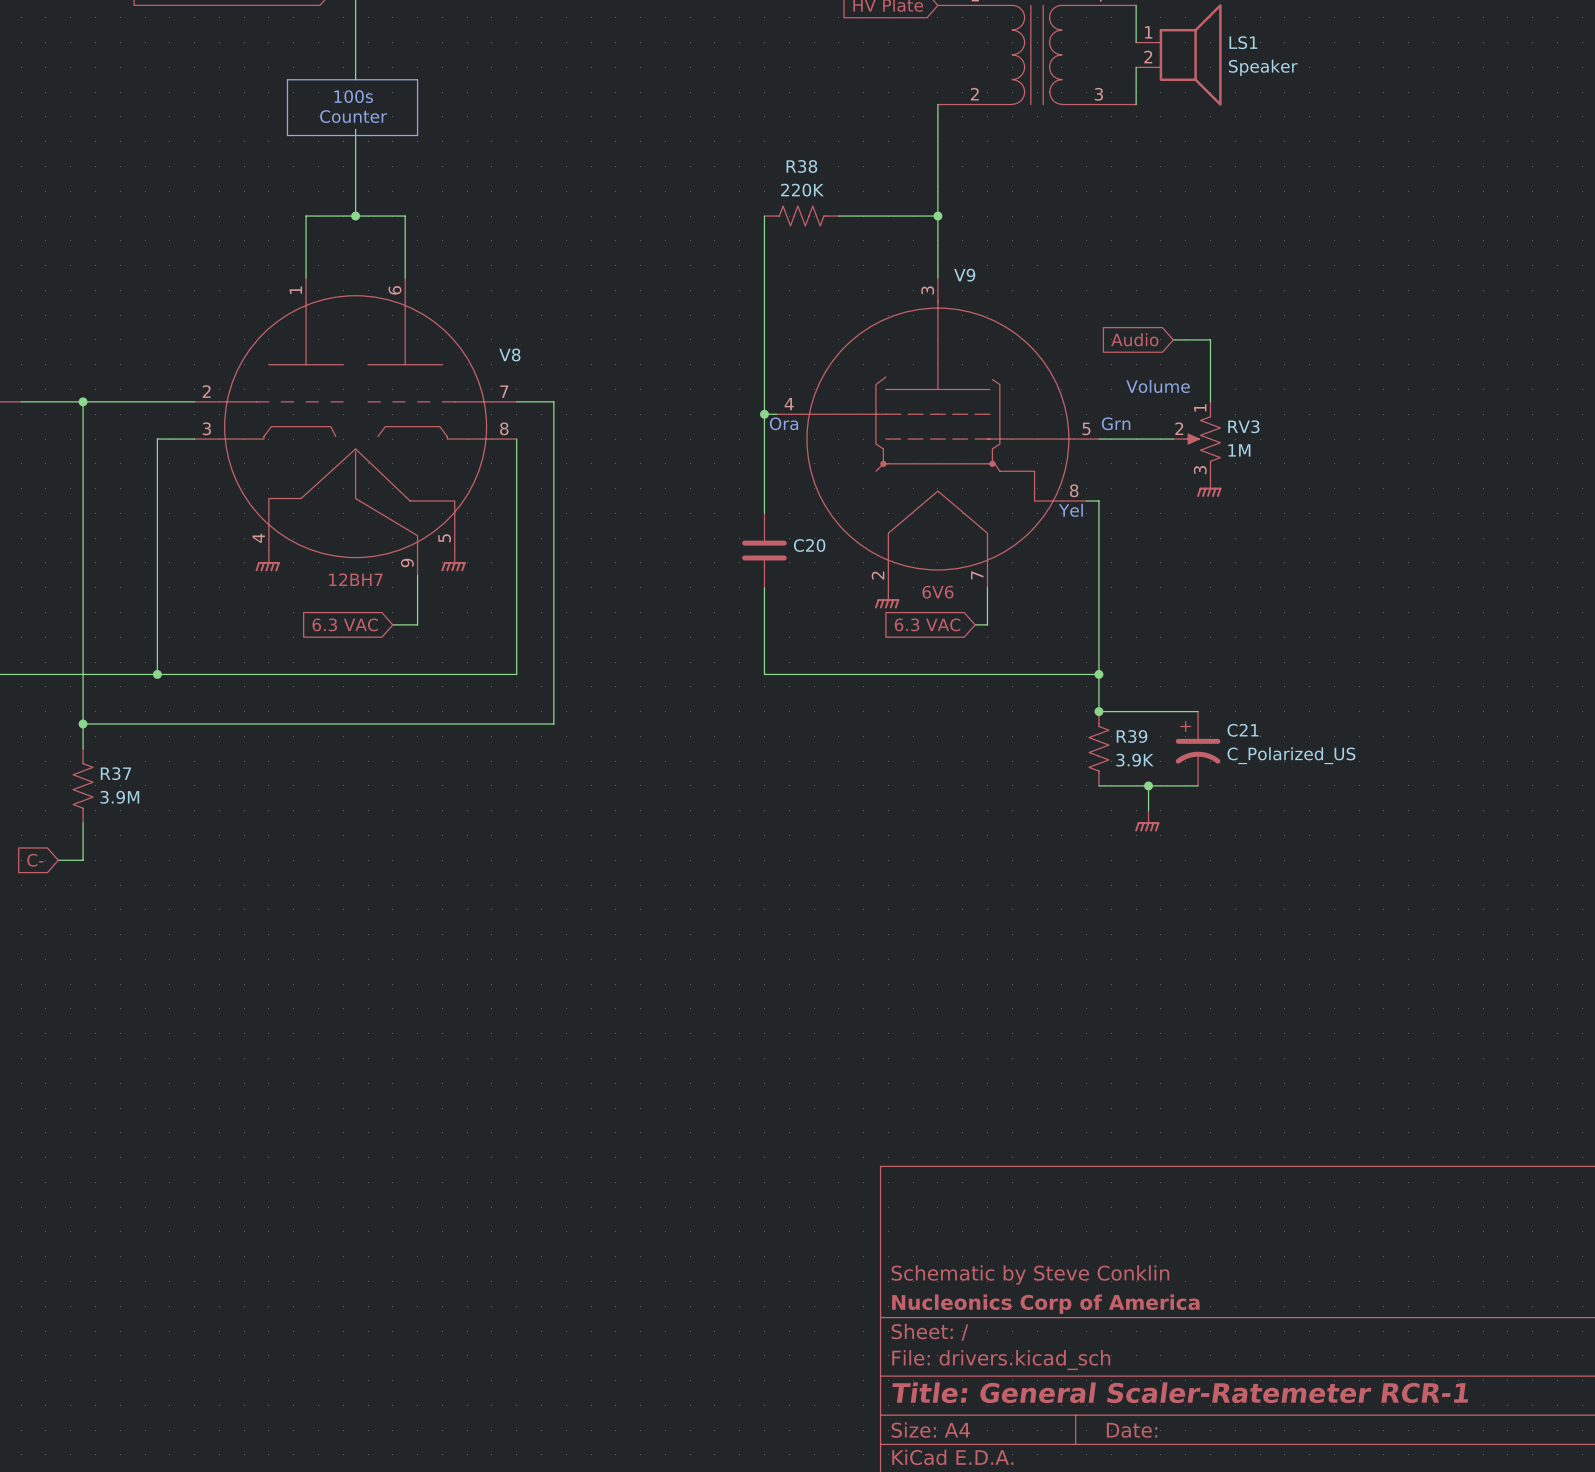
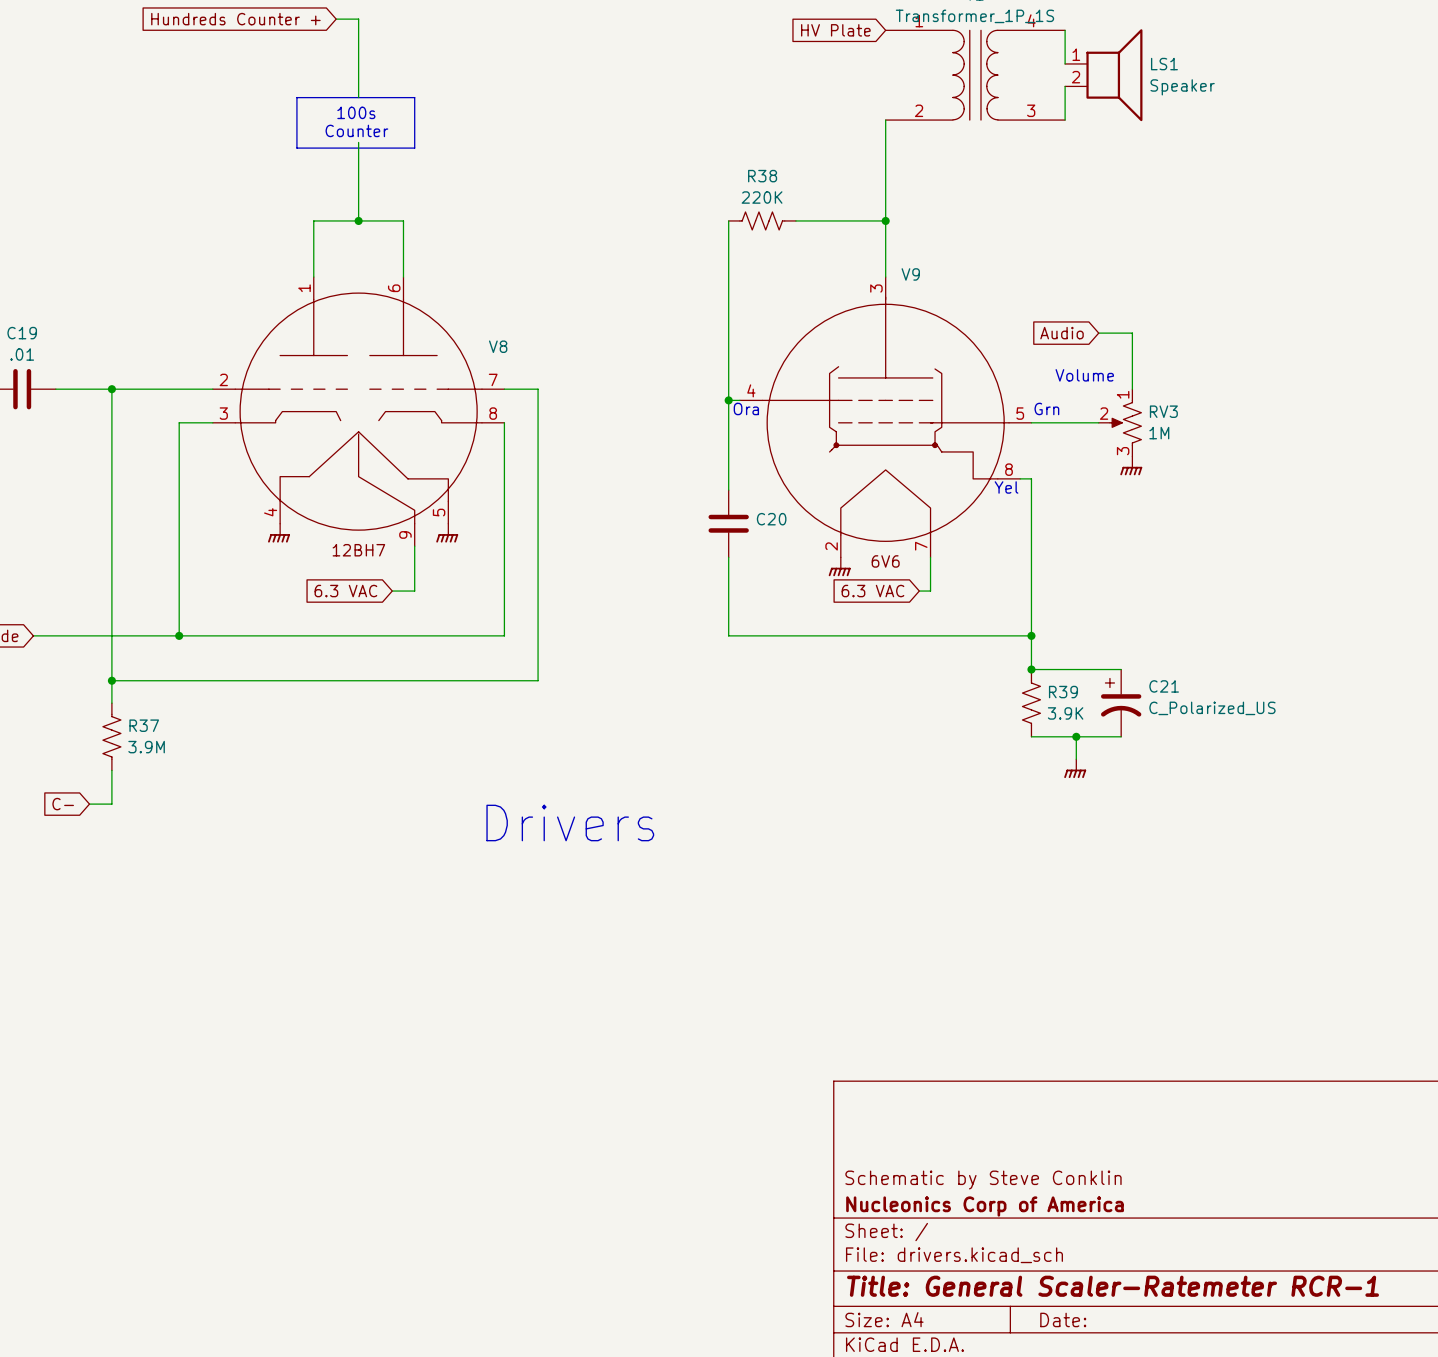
text: none -> Drivers (570, 822)

